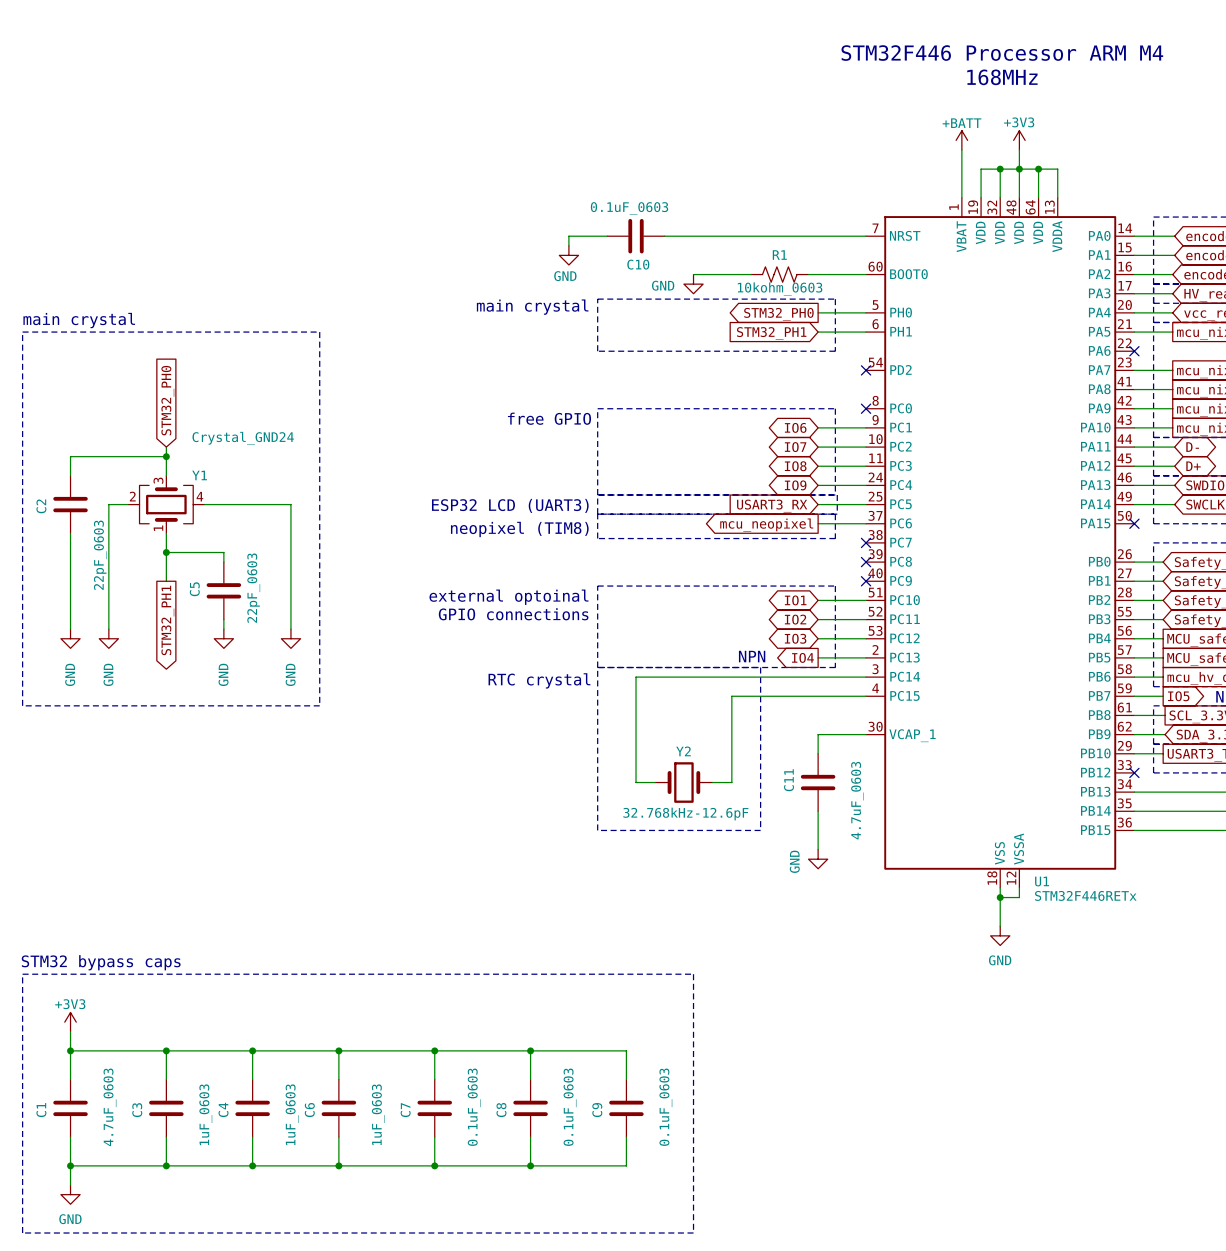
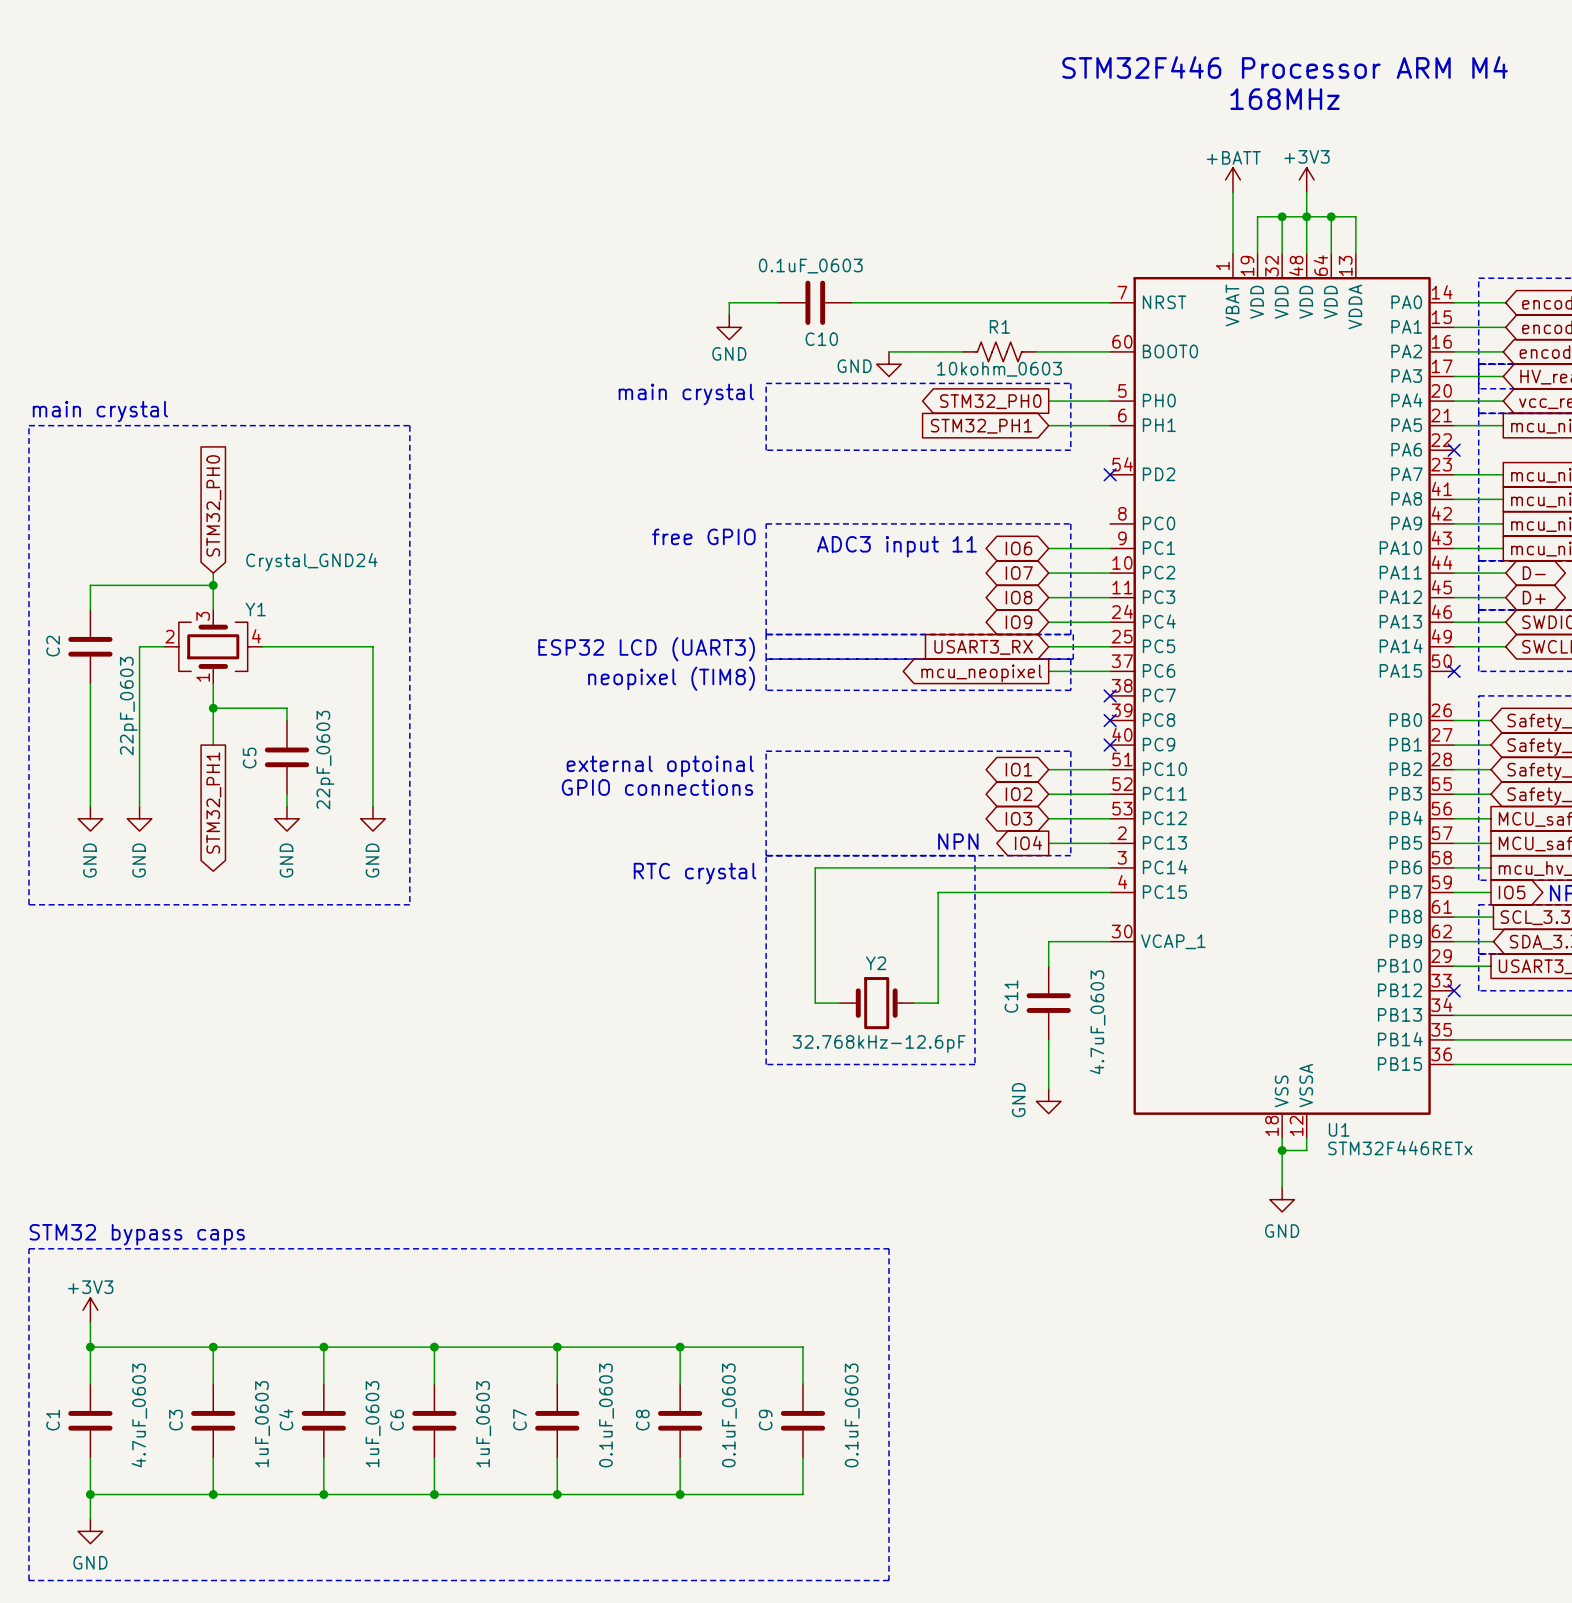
no-connect mark: (866, 408) -> none
text: none -> ADC3 input 11 (896, 546)

